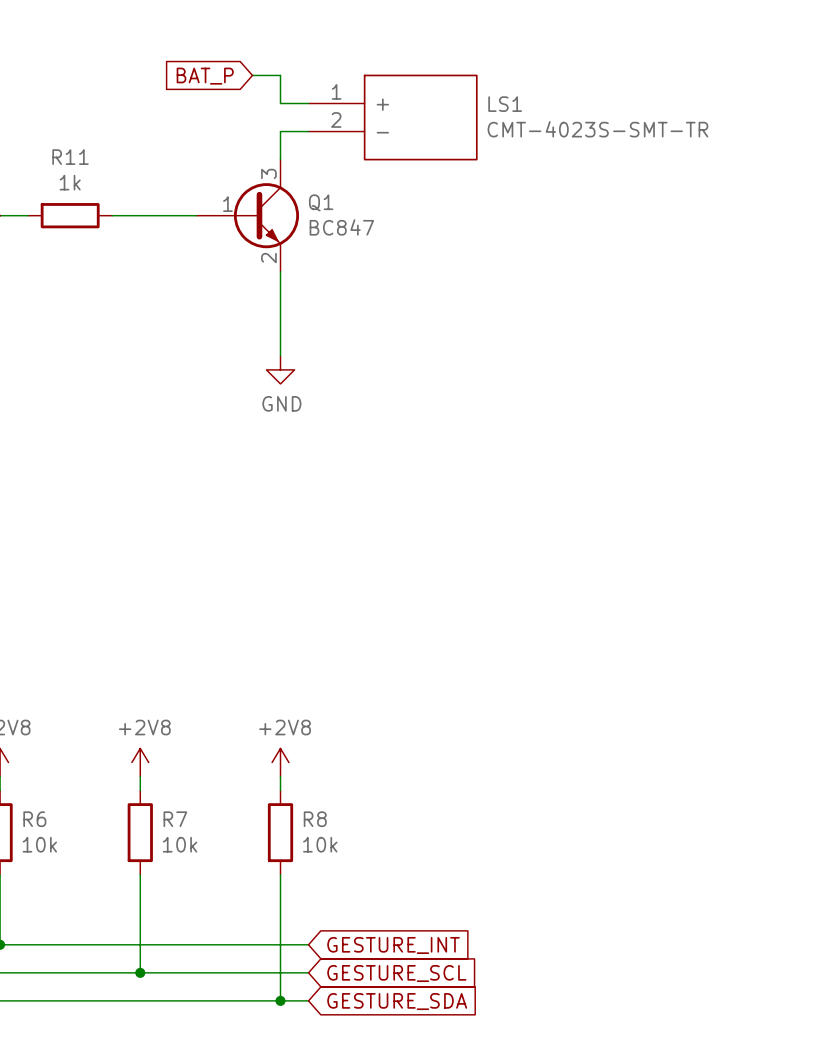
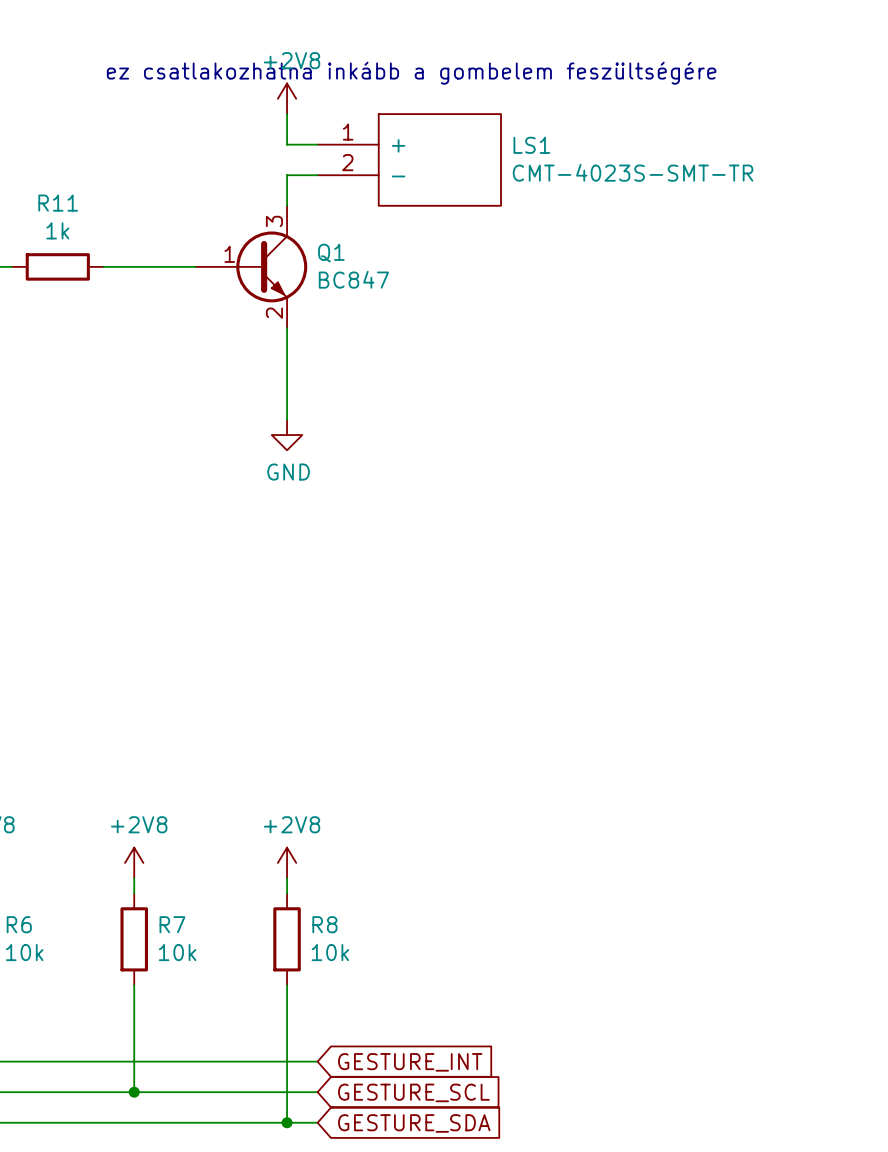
text: none -> ez csatlakozhatna inkább a gombelem feszültségére (411, 73)
power symbol: none -> +2V8 (287, 98)
wire: (252, 75) (280, 75) -> none
global label: BAT_P (205, 76) -> none

